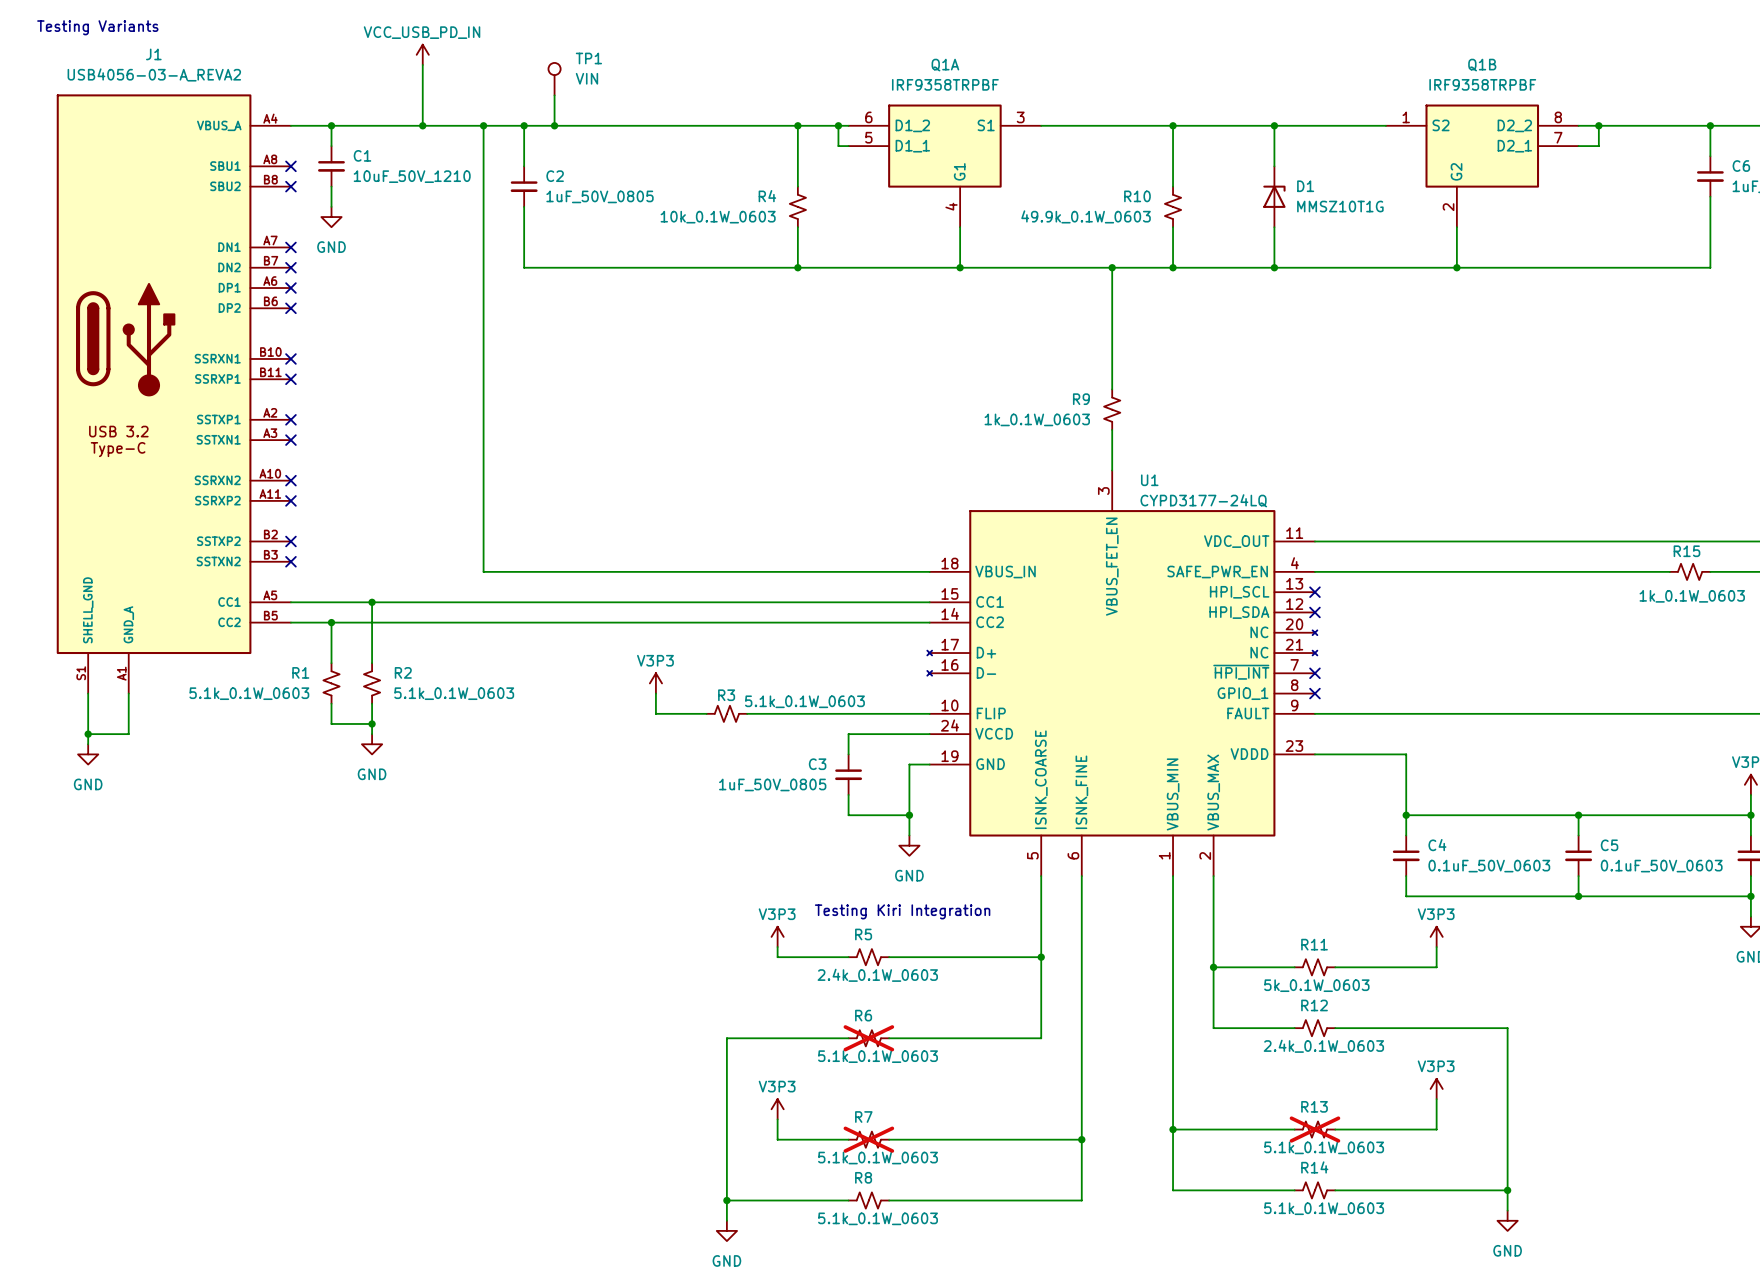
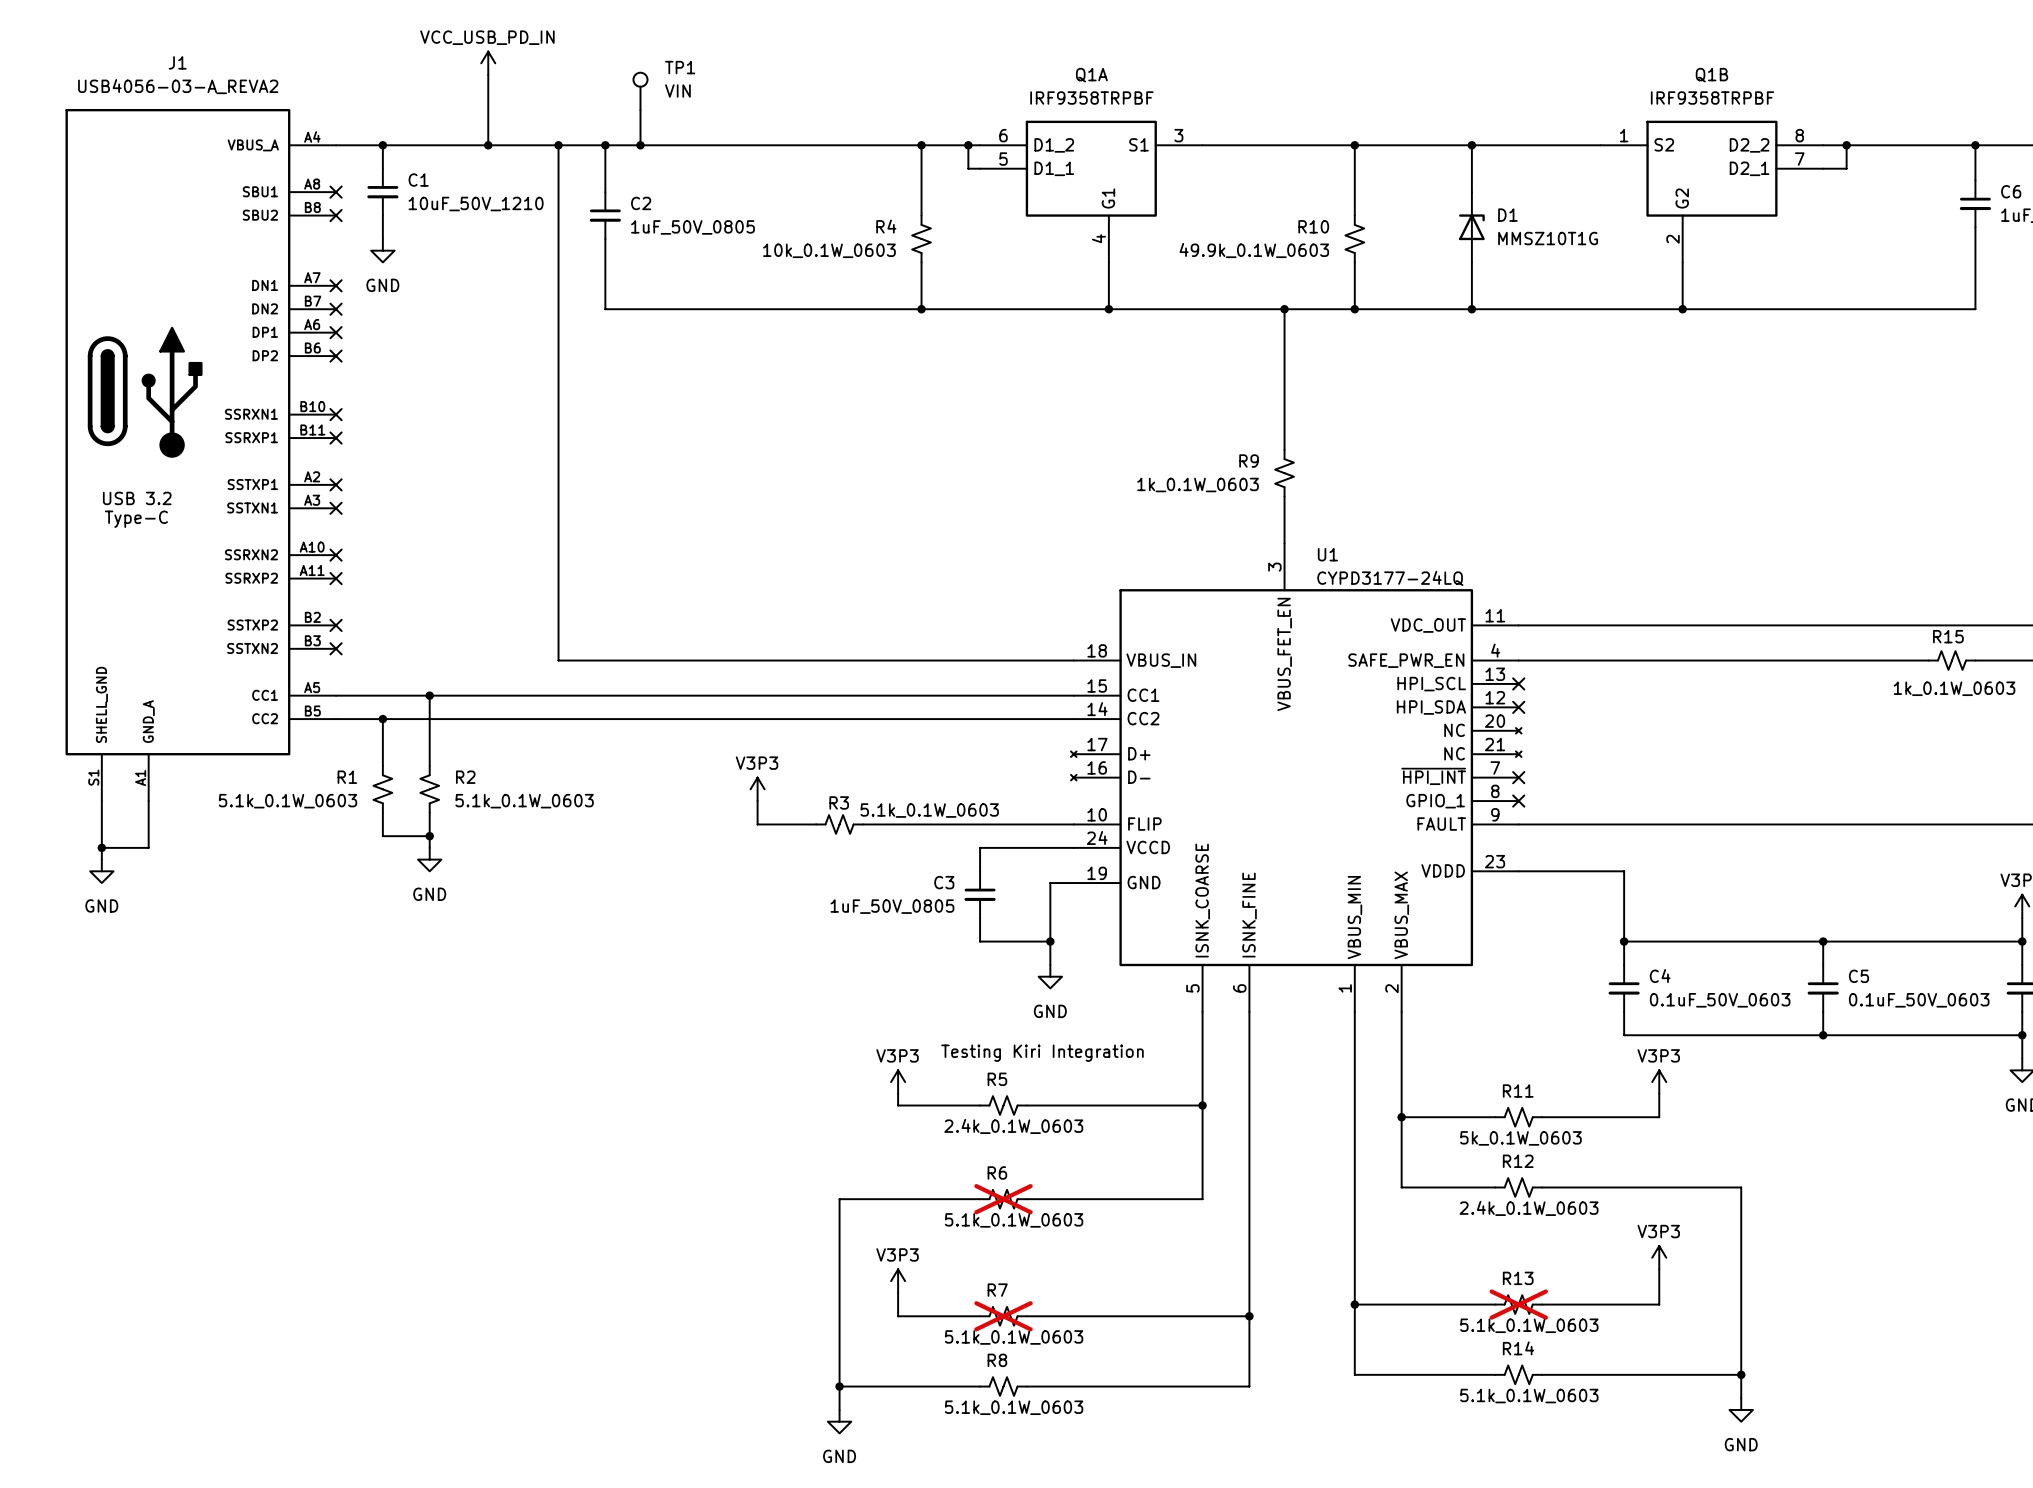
text: Testing Variants (97, 27) -> none

